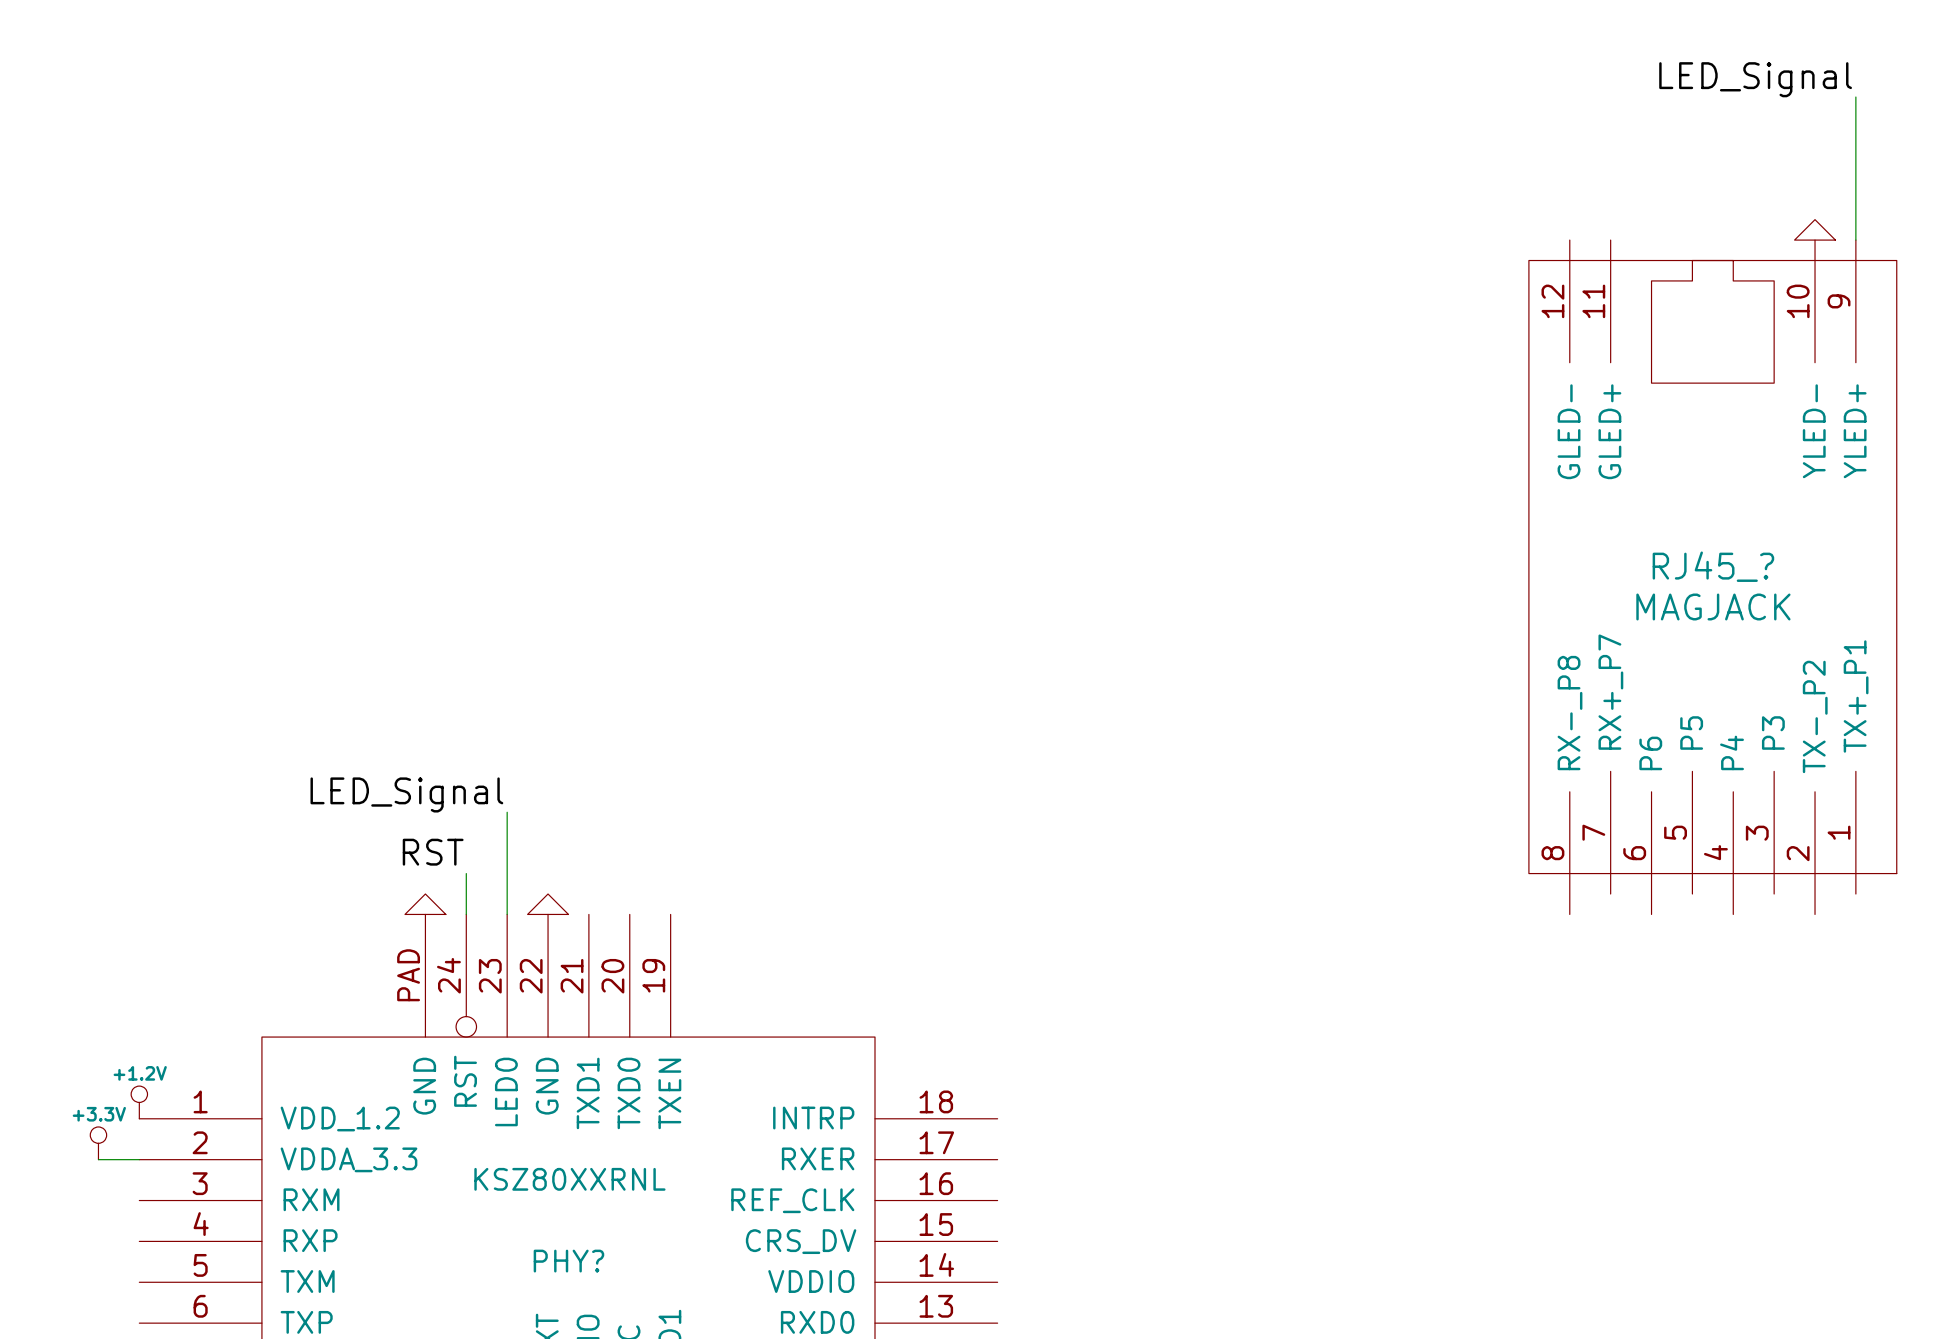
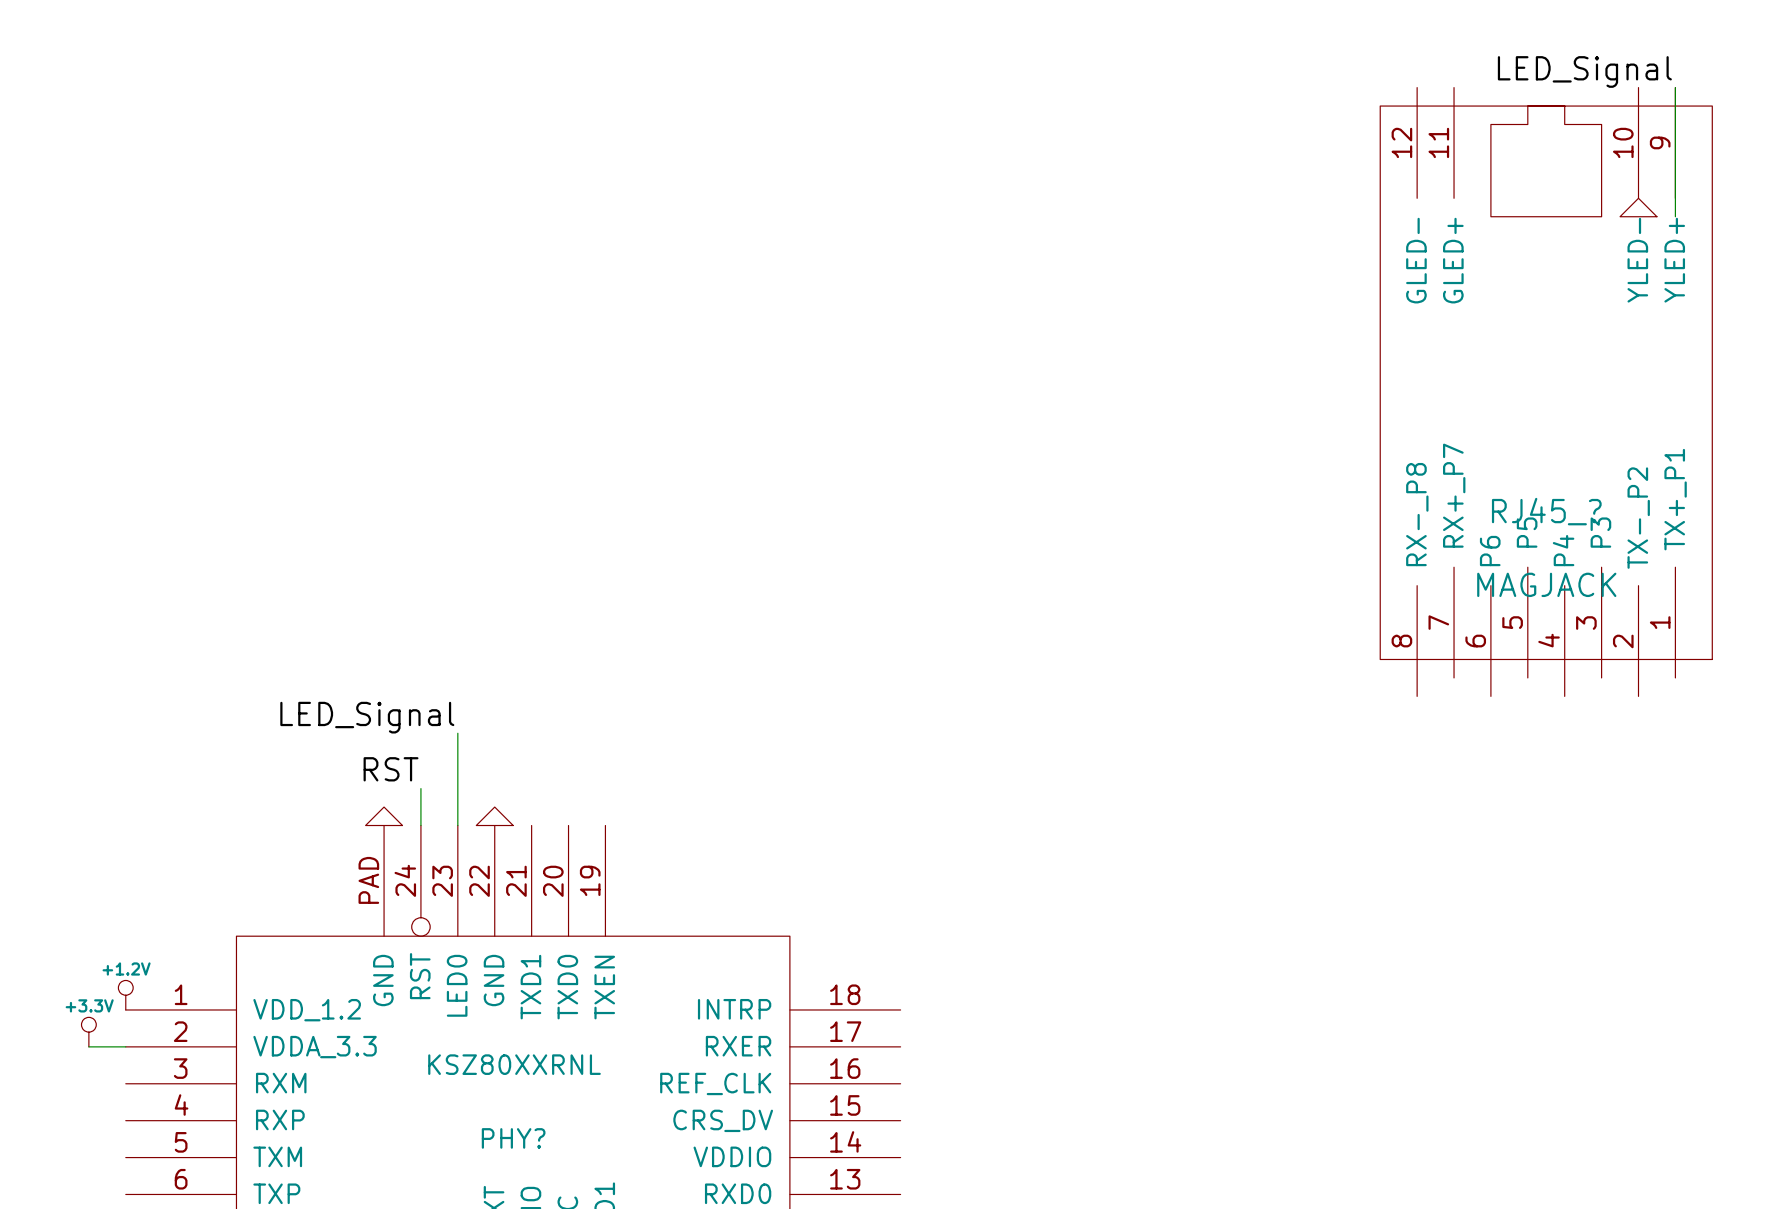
RJ45_? position: (1712, 577) -> (1546, 391)
RJ45_? value position: MAGJACK (1713, 606) -> MAGJACK (1546, 584)

